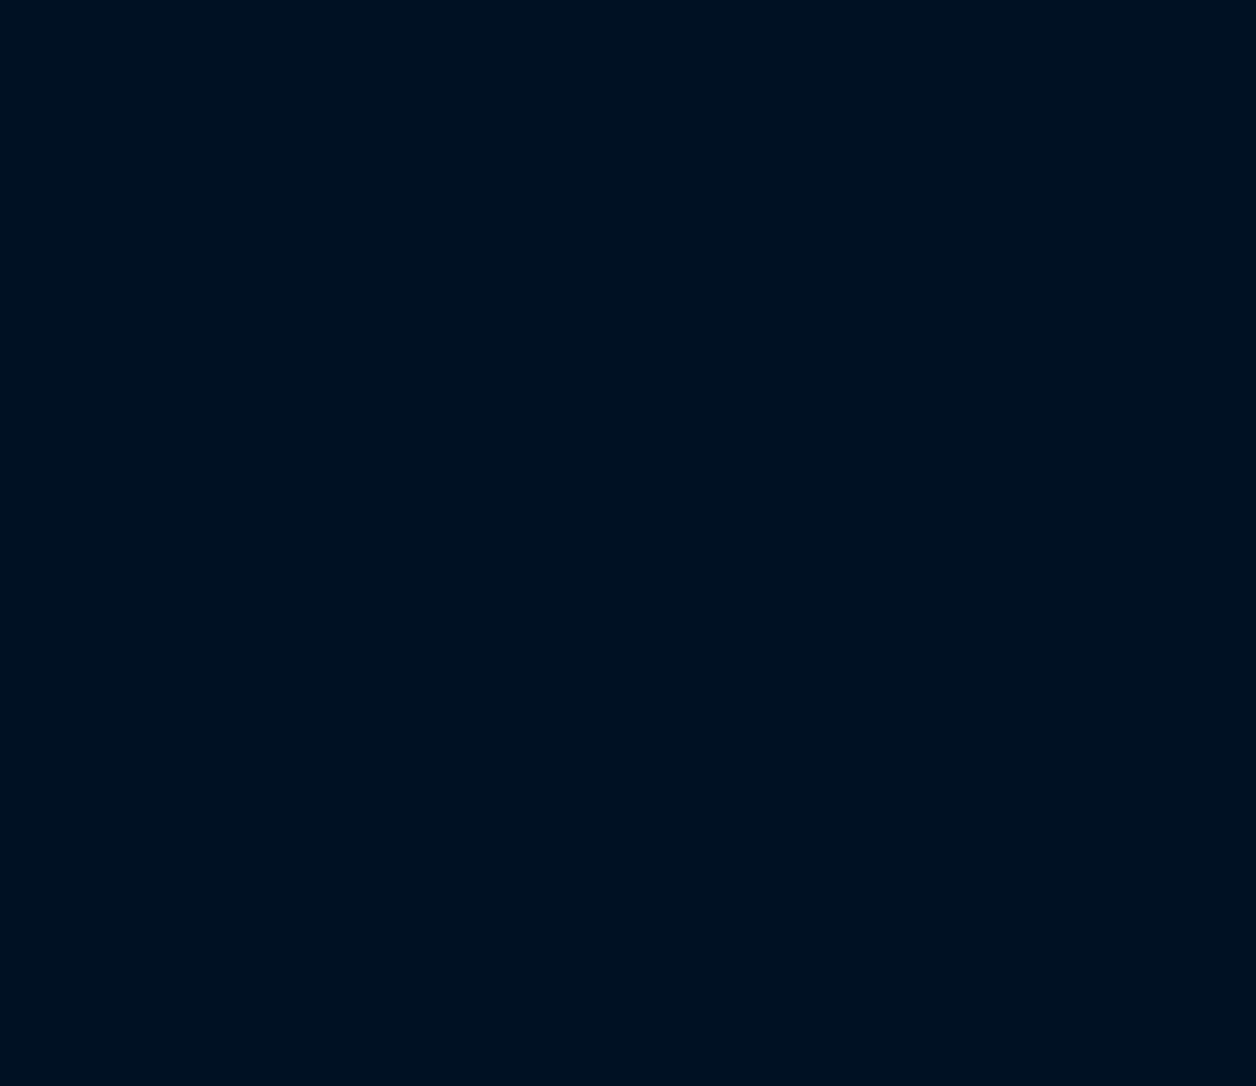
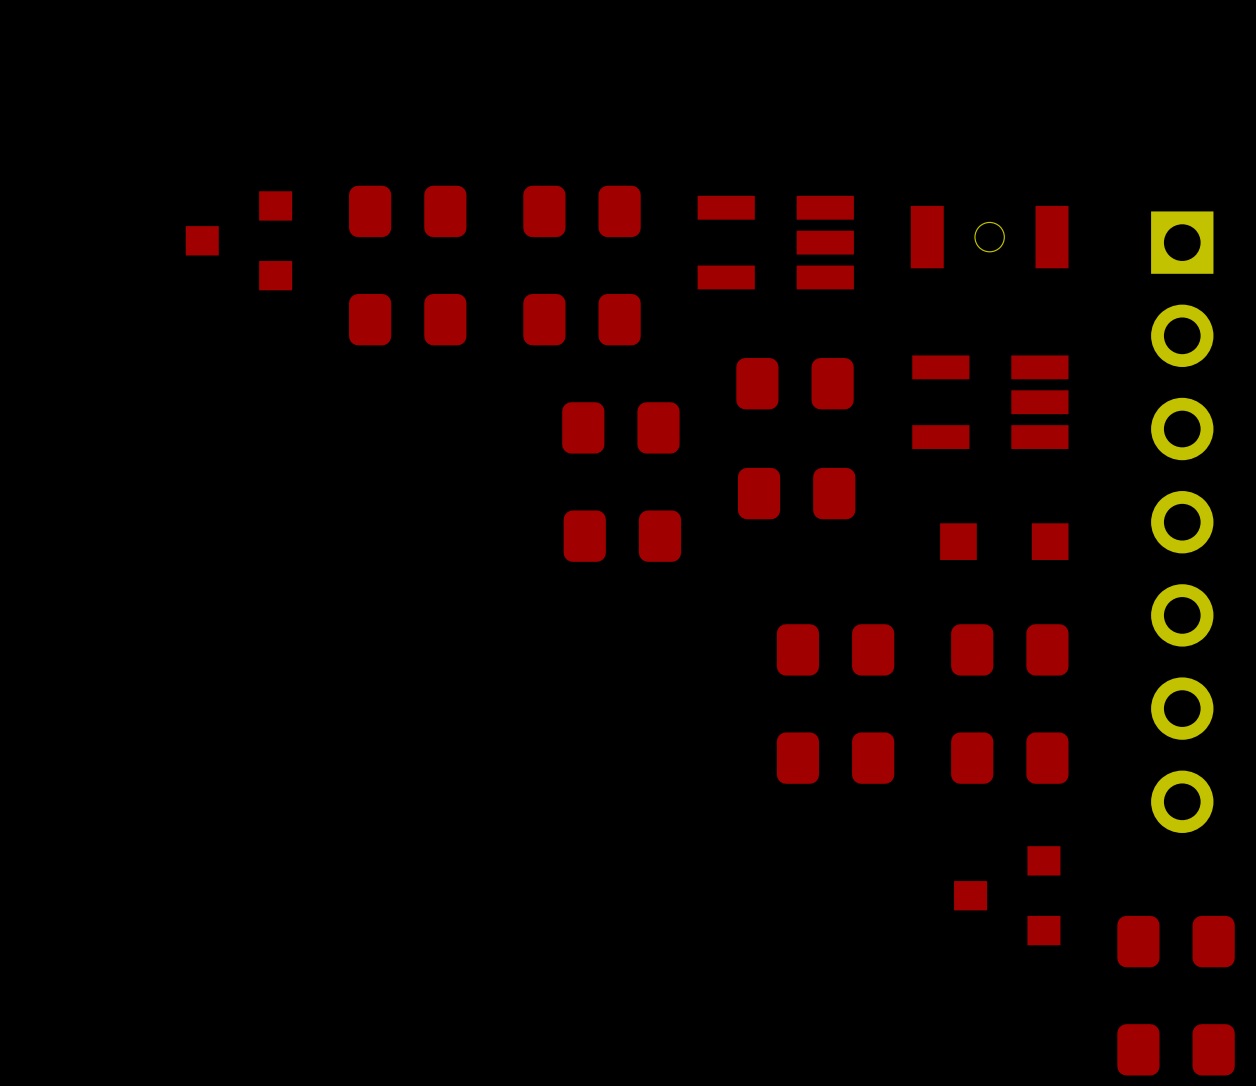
part: none -> (407, 211)
part: none -> (582, 211)
part: none -> (989, 237)
part: none -> (238, 240)
part: none -> (775, 242)
part: none -> (407, 319)
part: none -> (582, 319)
part: none -> (795, 383)
part: none -> (990, 402)
part: none -> (620, 427)
part: none -> (796, 493)
part: none -> (1182, 522)
part: none -> (622, 536)
part: none -> (1004, 541)
part: none -> (835, 649)
part: none -> (1009, 649)
part: none -> (835, 758)
part: none -> (1009, 758)
part: none -> (1007, 895)
part: none -> (1176, 941)
part: none -> (1176, 1049)

